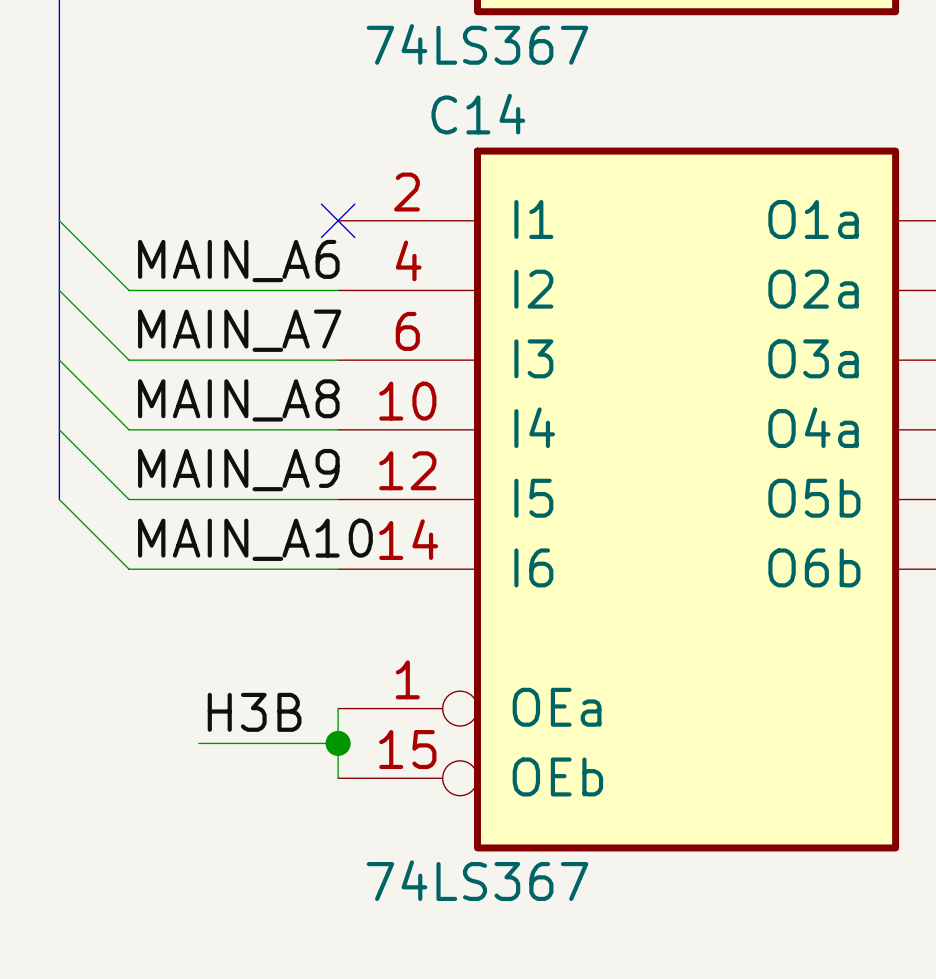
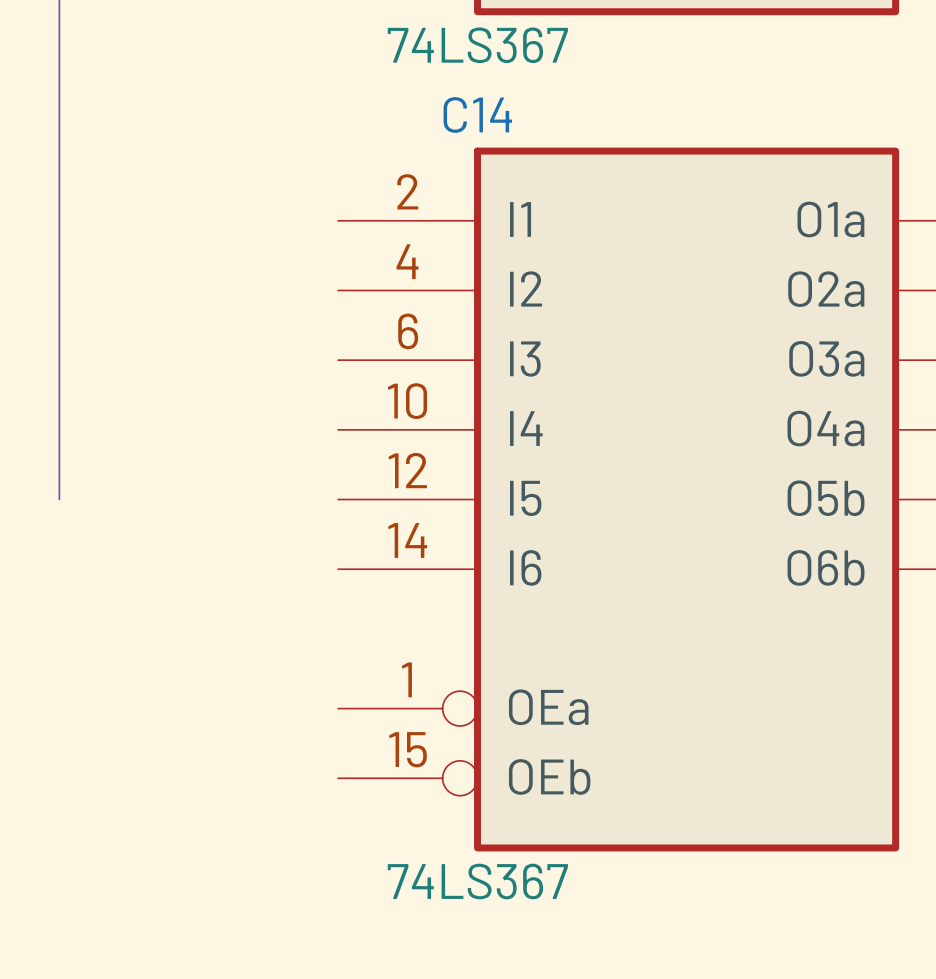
wire: (59, 220) (129, 290) (338, 290) -> none
no-connect mark: (338, 220) -> none
label: MAIN_A6 (238, 261) -> none
wire: (59, 290) (129, 360) (338, 360) -> none
label: MAIN_A7 (239, 330) -> none
wire: (59, 360) (129, 429) (338, 429) -> none
label: MAIN_A8 (238, 400) -> none
wire: (59, 429) (129, 499) (338, 499) -> none
label: MAIN_A9 (238, 470) -> none
wire: (59, 499) (129, 569) (338, 569) -> none
label: MAIN_A10 (255, 539) -> none
wire: (338, 708) (338, 778) -> none
label: H3B (254, 712) -> none
wire: (198, 743) (338, 743) -> none
junction: (338, 743) -> none

